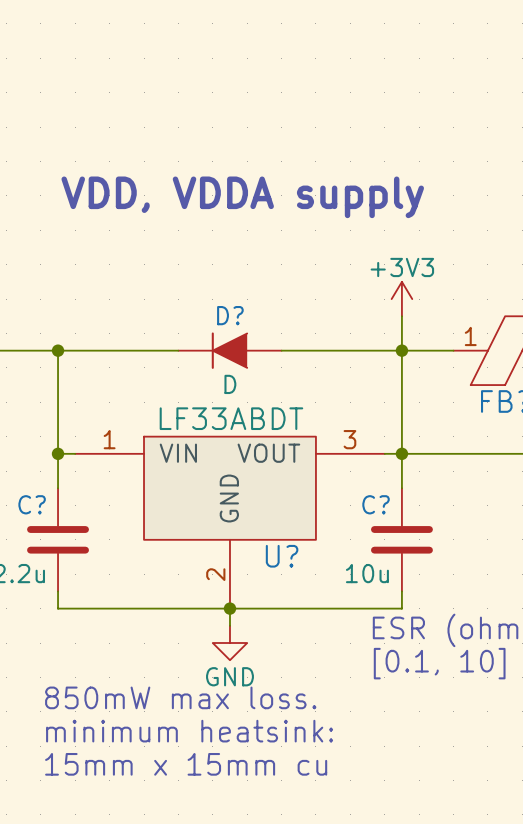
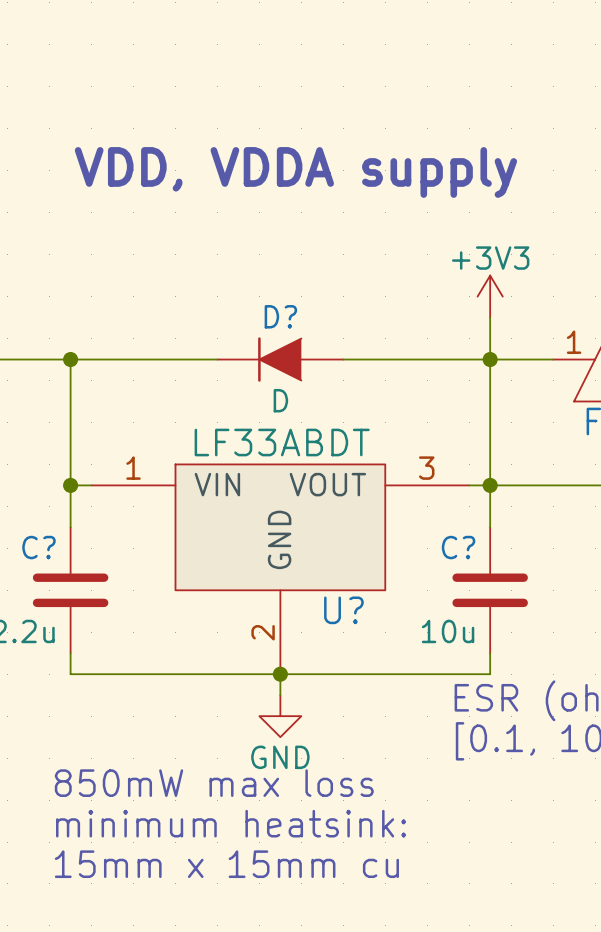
text: 850mW max loss. (180, 697) -> 850mW max loss (214, 783)

